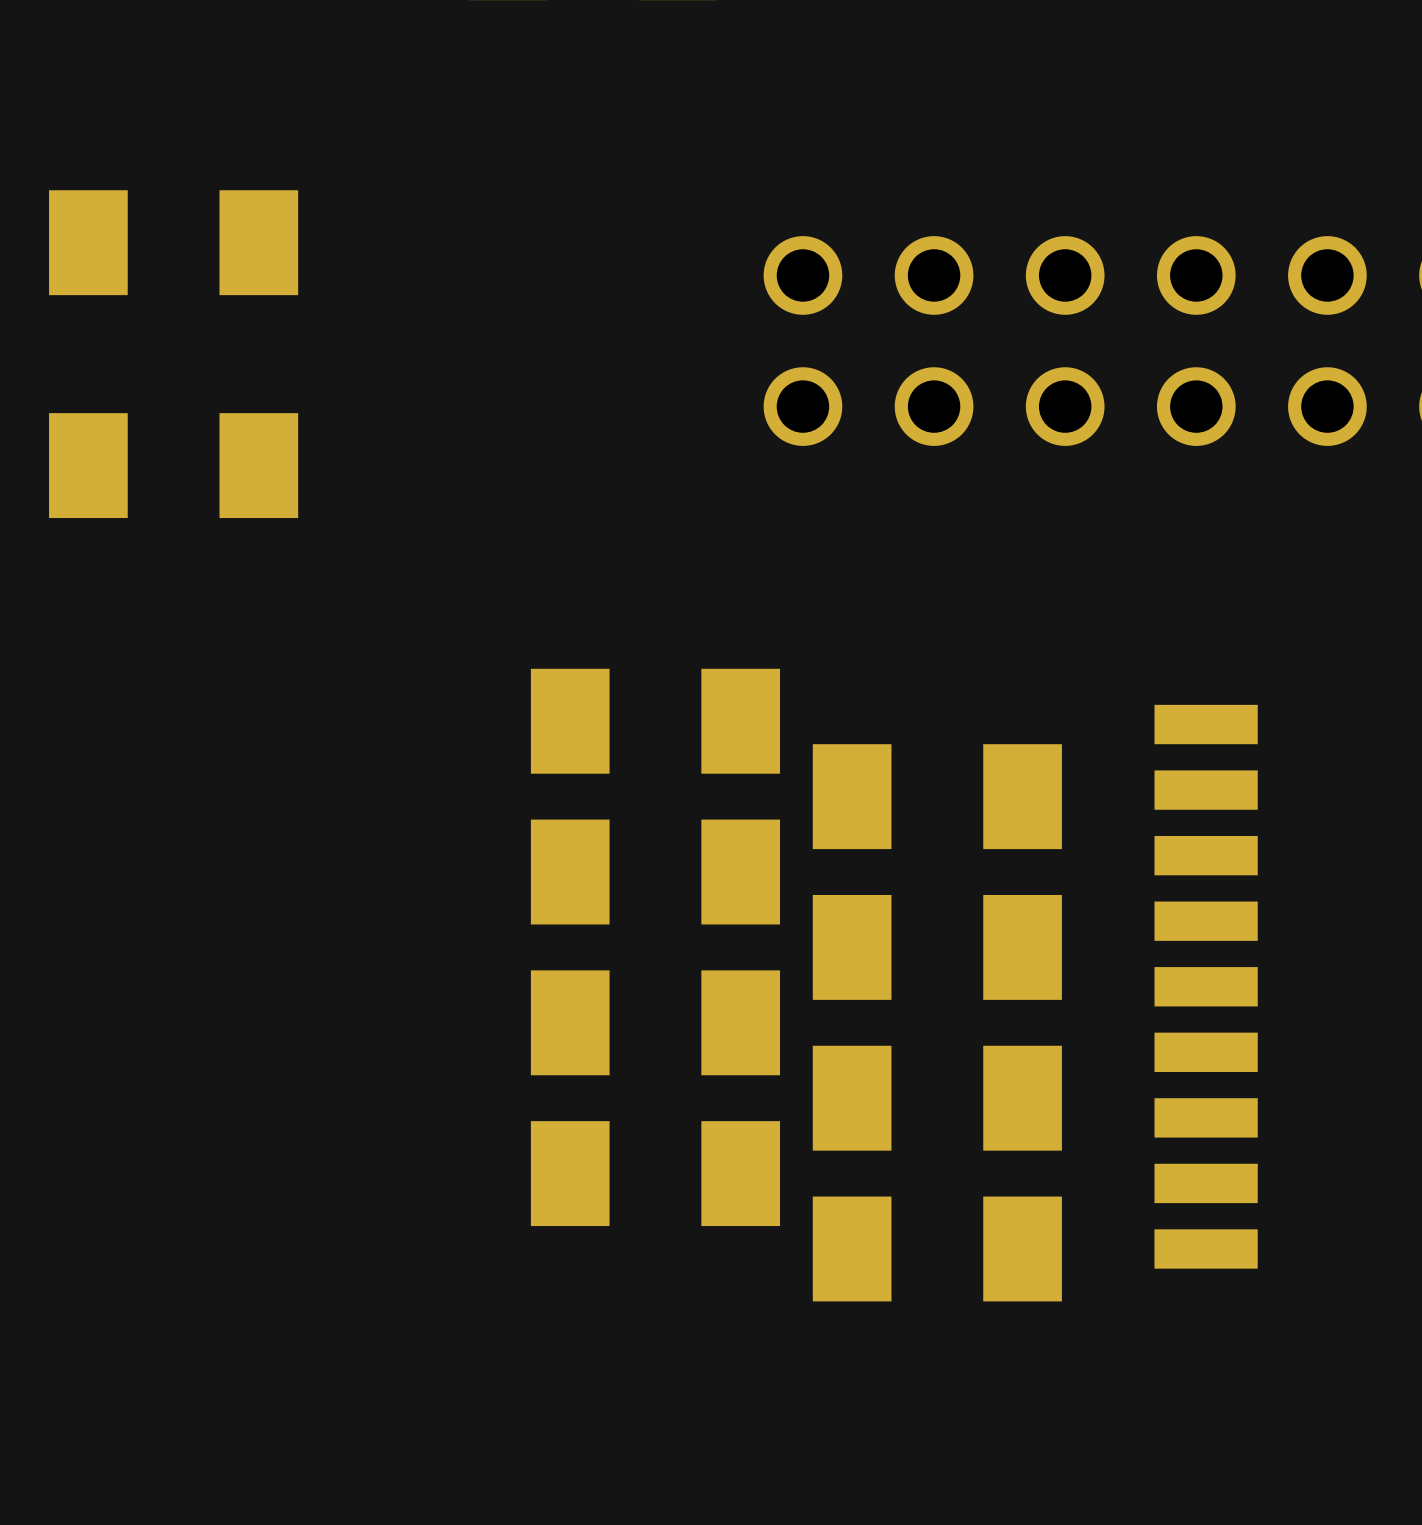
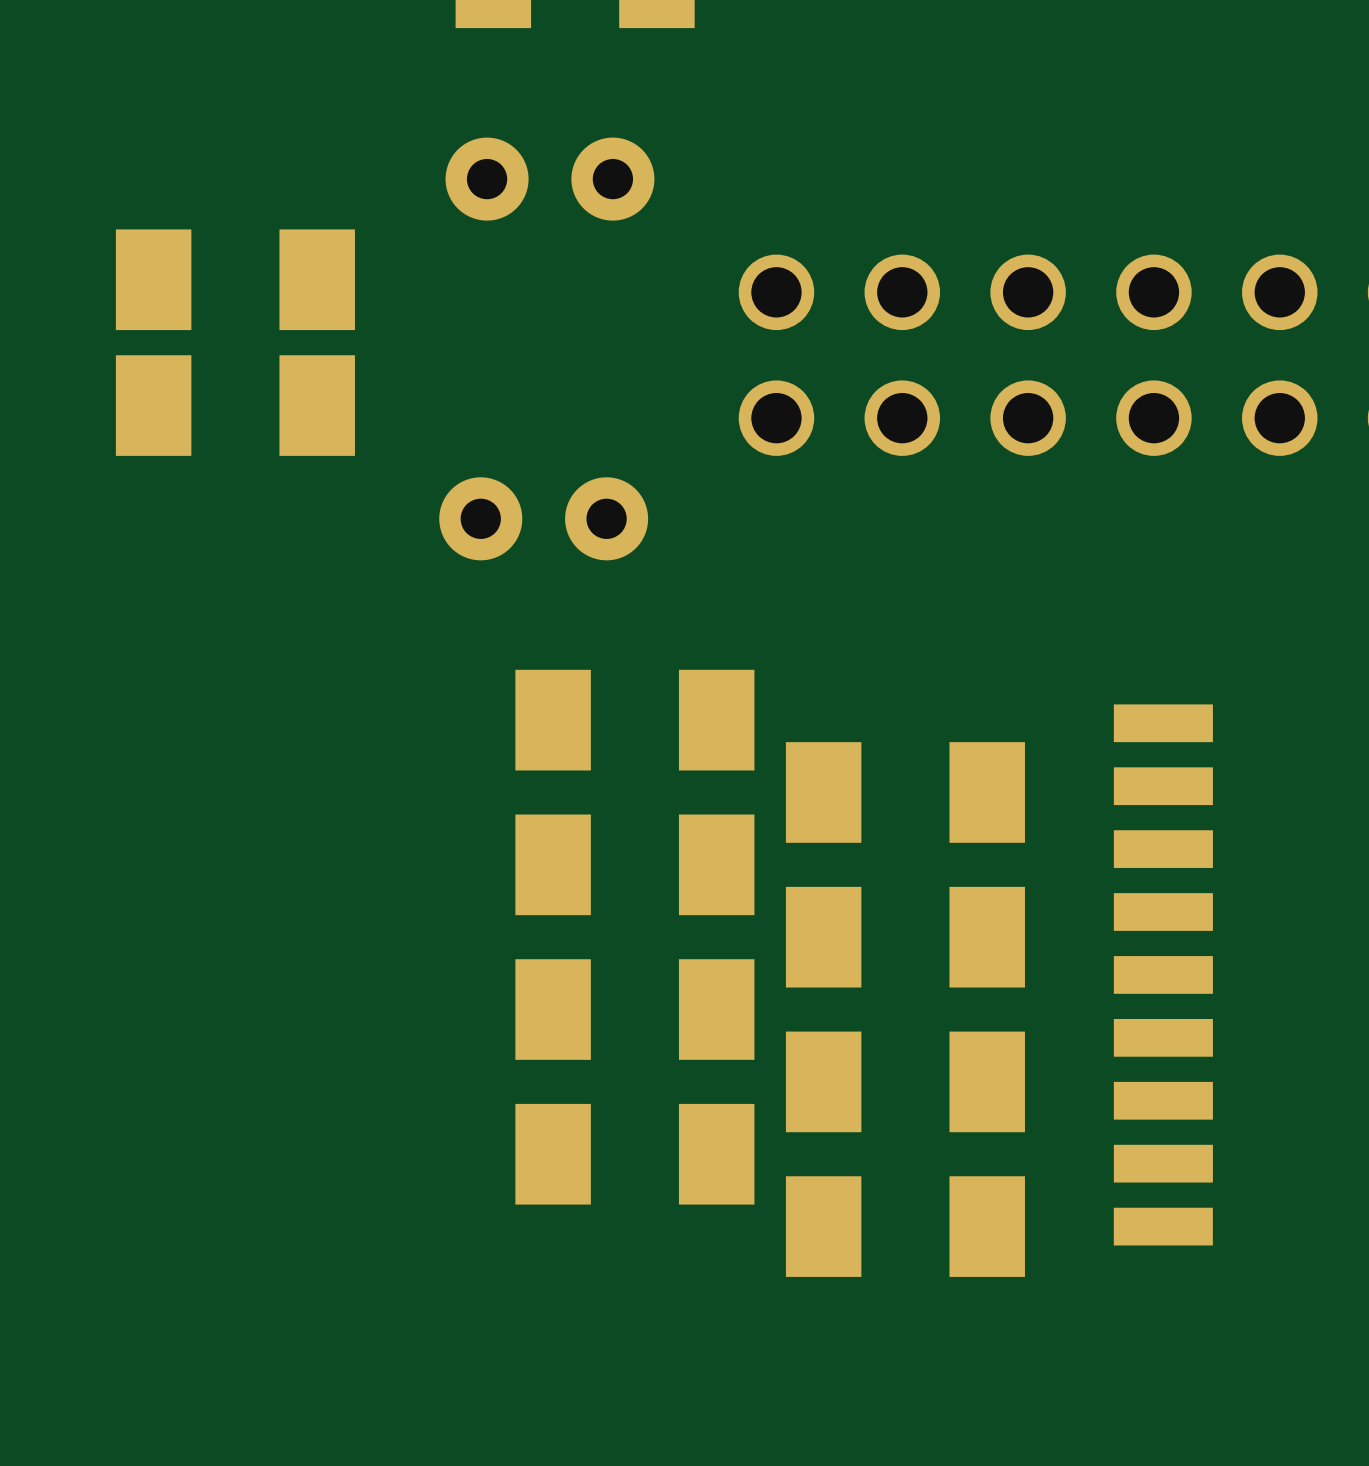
part: none -> (549, 179)
part position: (173, 242) -> (235, 279)
part: none -> (235, 405)
part: (173, 465) -> none
part: none -> (543, 518)

